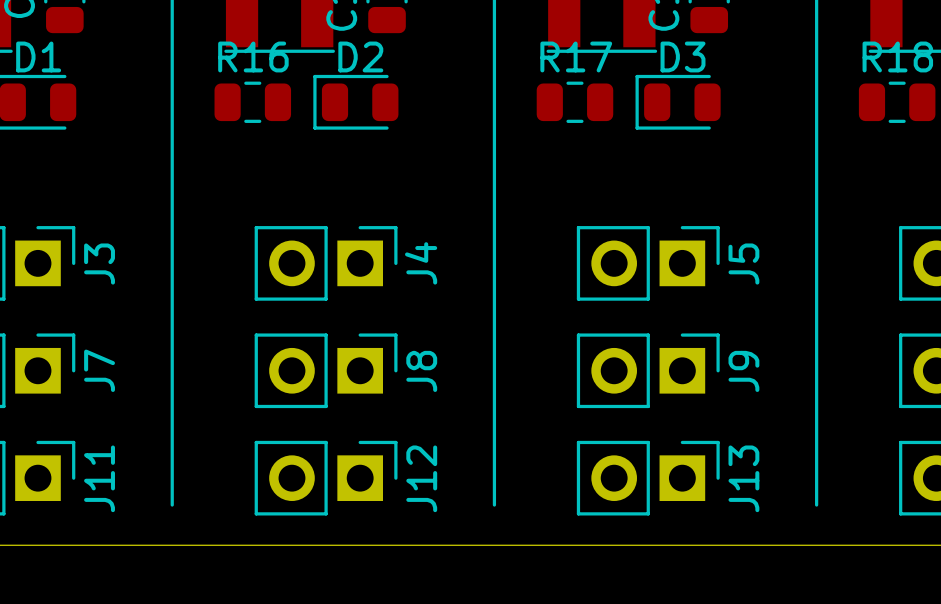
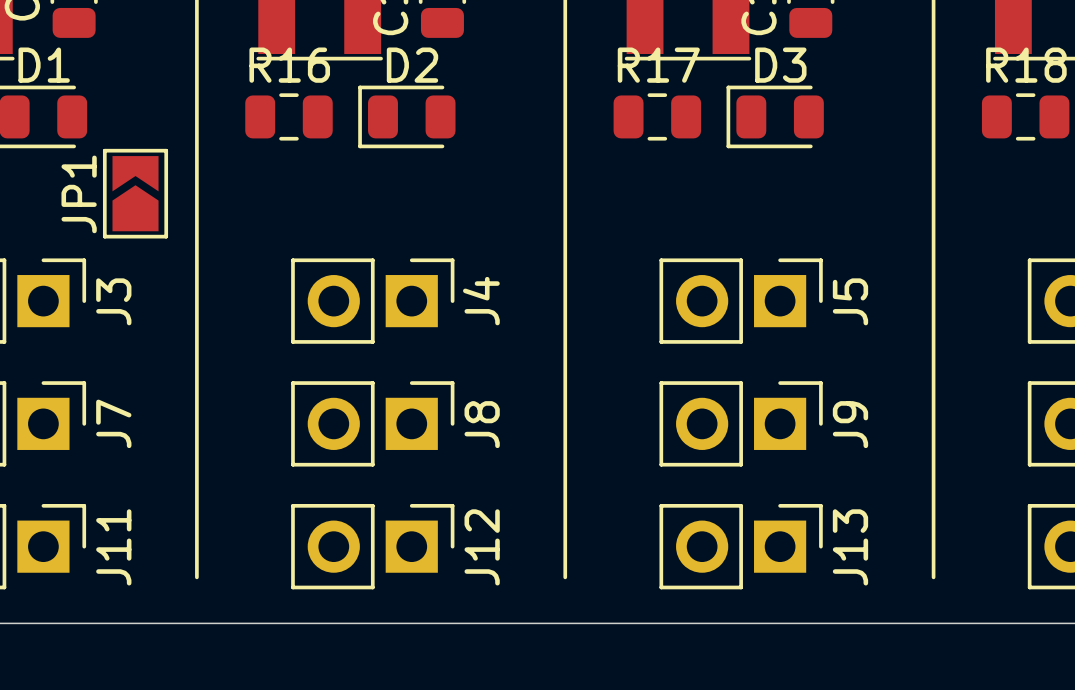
JP1: none -> (135, 193)

